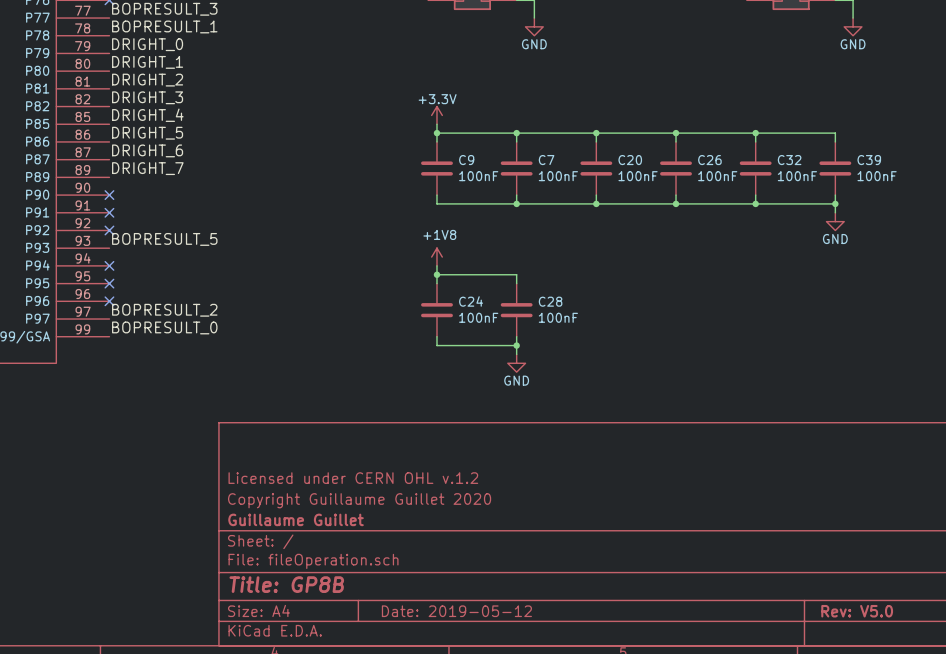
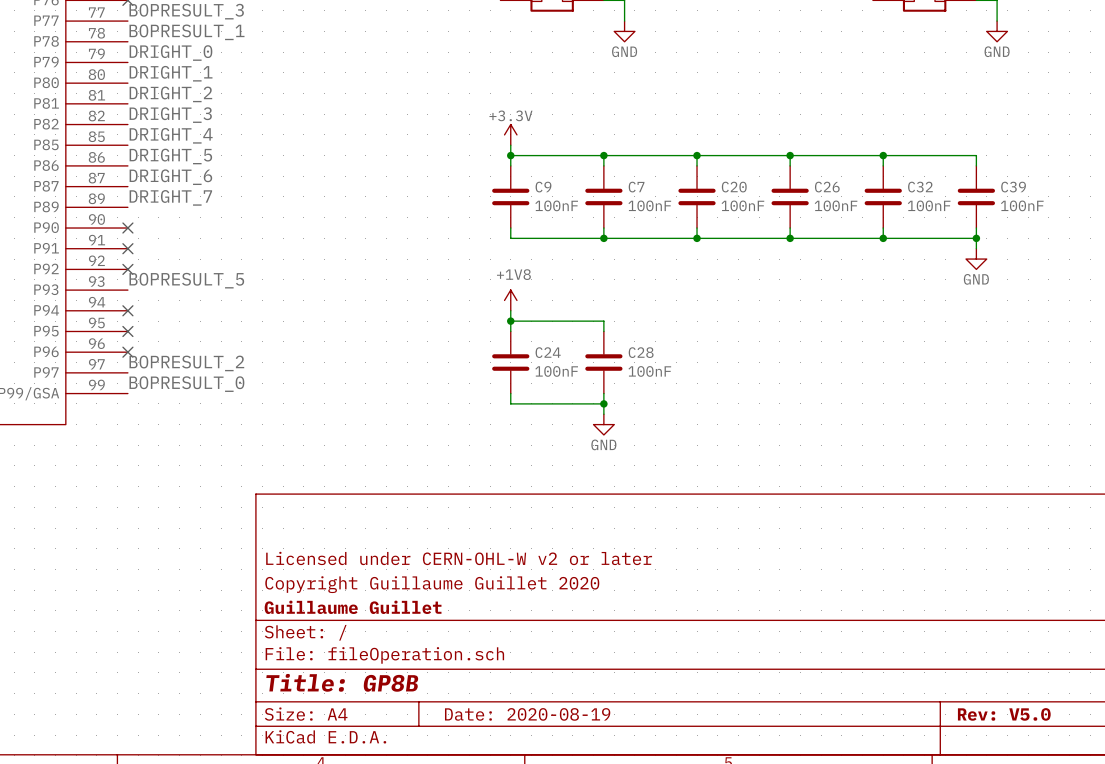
title block: Licensed under CERN OHL v.1.2 (353, 478) -> Licensed under CERN-OHL-W v2 or later (459, 558)
title block: Date: 2019-05-12 (456, 611) -> Date: 2020-08-19 (527, 714)

